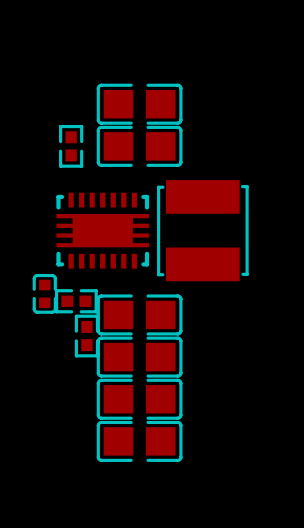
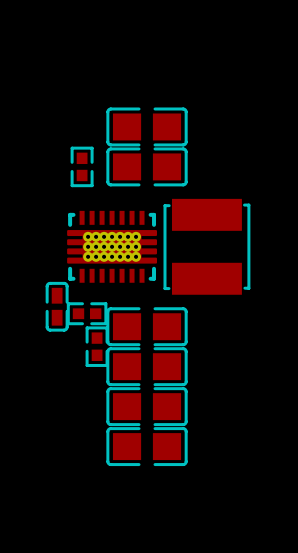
part footprint: [56, 192, 150, 275] -> [67, 210, 158, 289]
part footprint: [32, 273, 57, 314] -> [45, 281, 69, 332]

